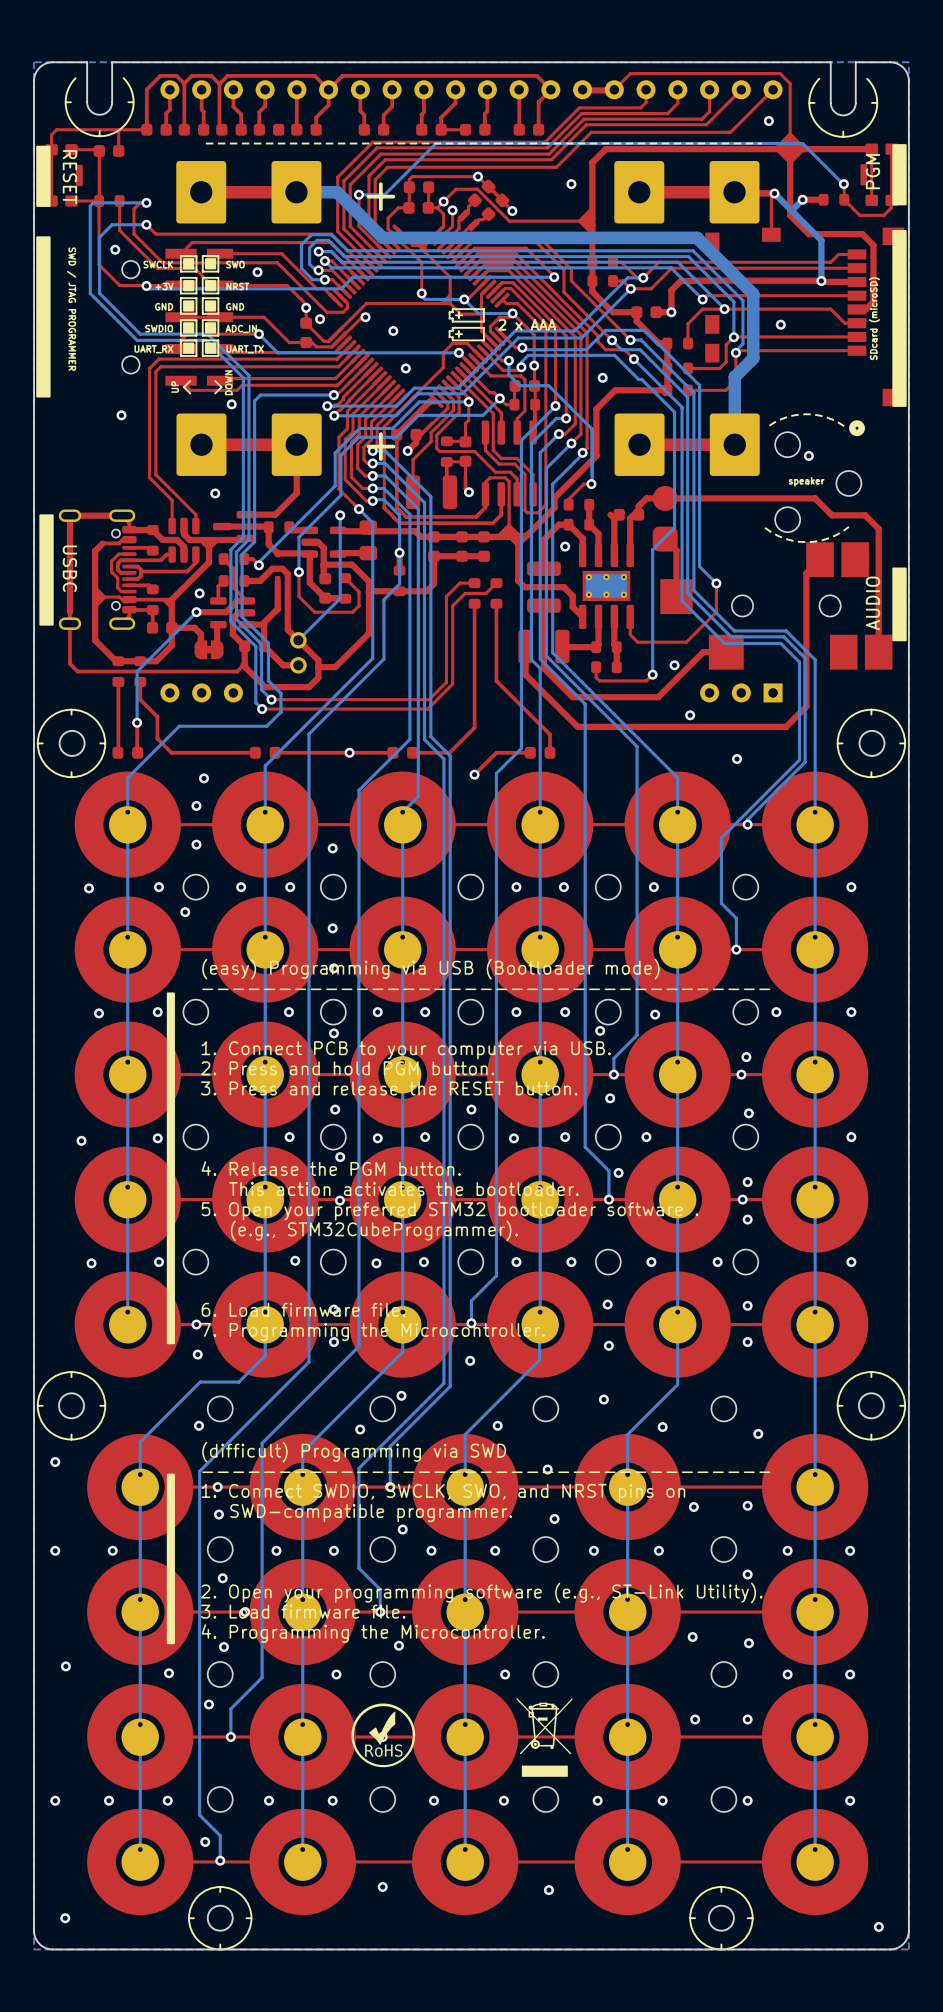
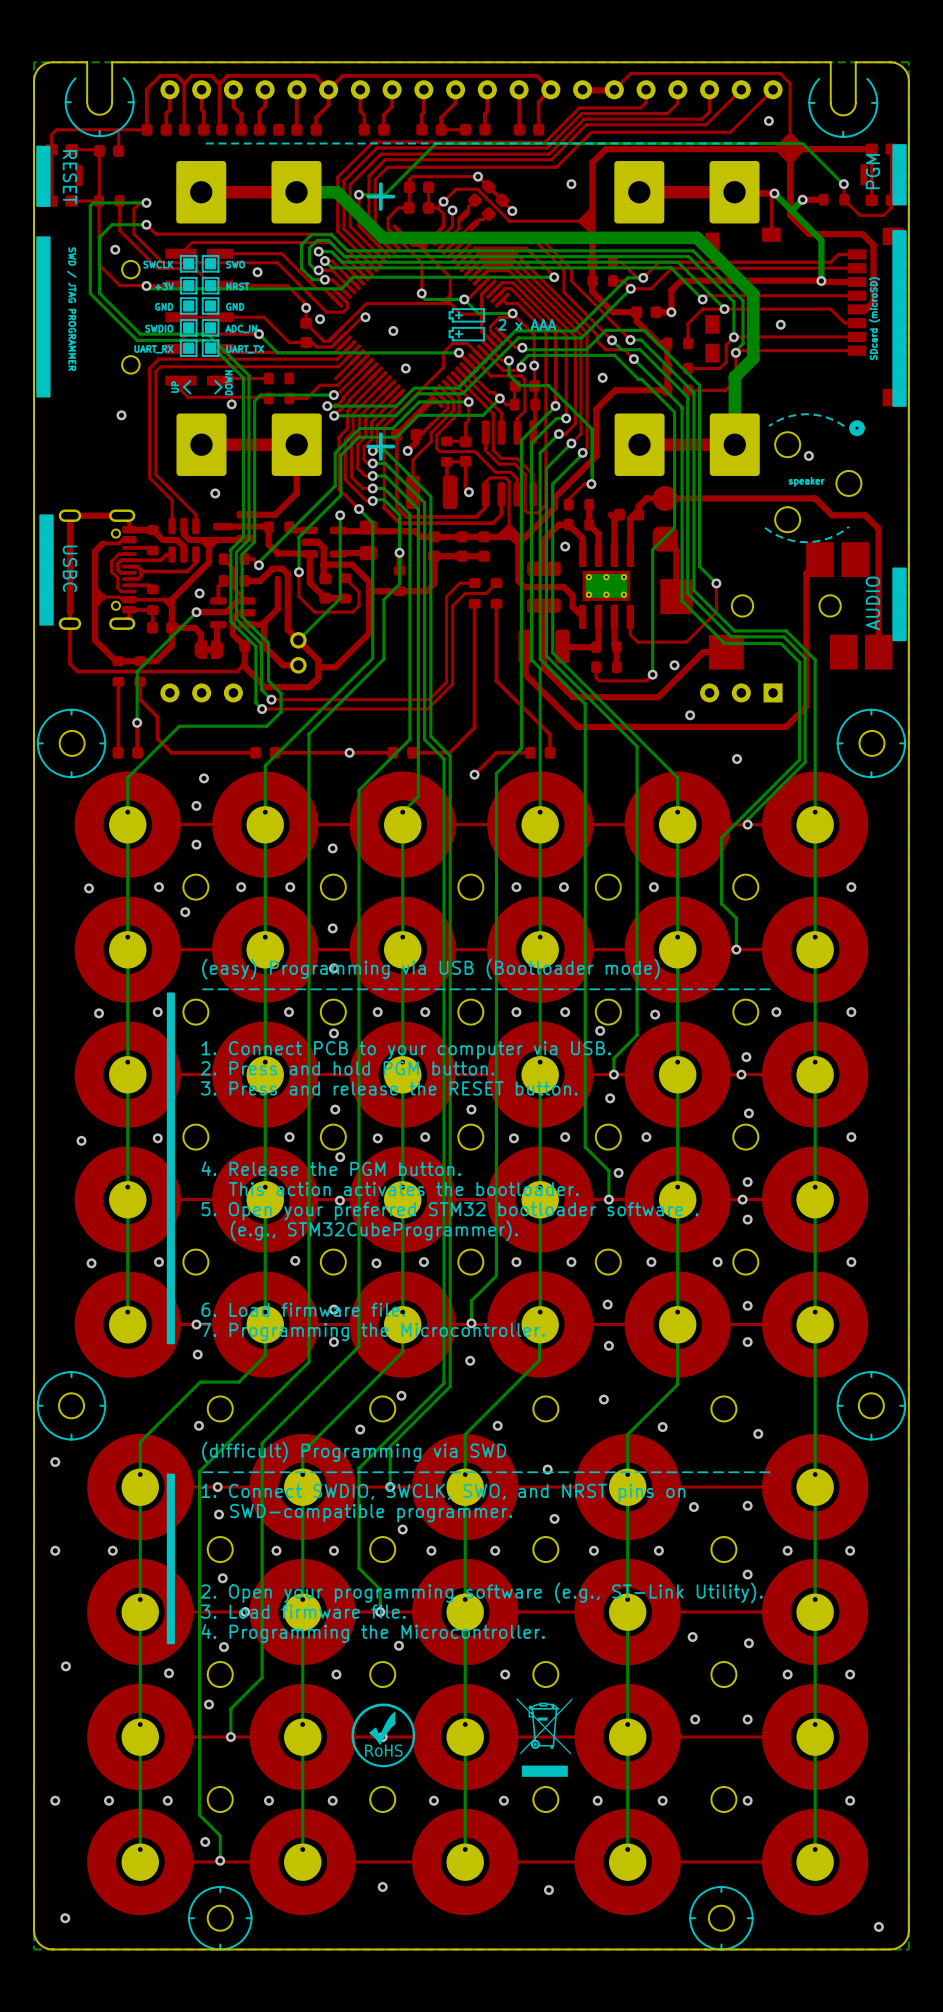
part: none -> (278, 378)
top track: (335, 378) (222, 378) -> (268, 378) (222, 378)
top track: (181, 380) (190, 390) (237, 390) (242, 385) (319, 385) -> (181, 380) (181, 390) (187, 397) (268, 398)
top track: none -> (319, 385) (306, 398) (289, 398)
part: none -> (278, 398)

